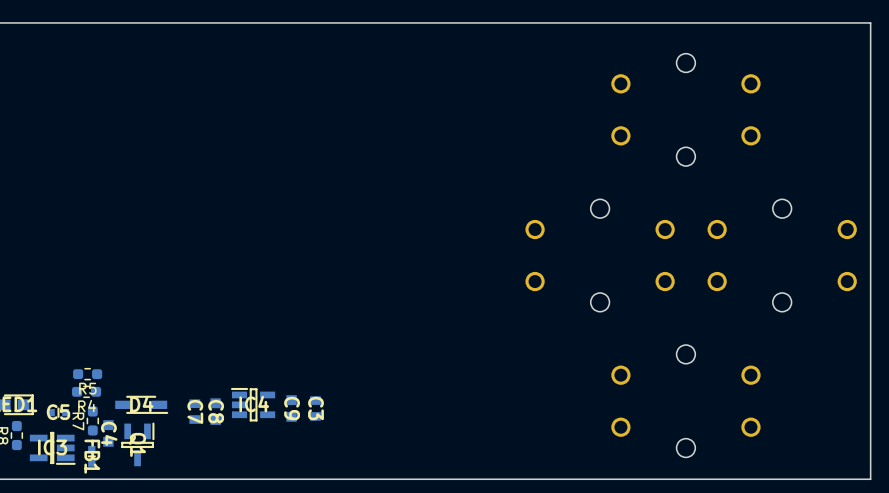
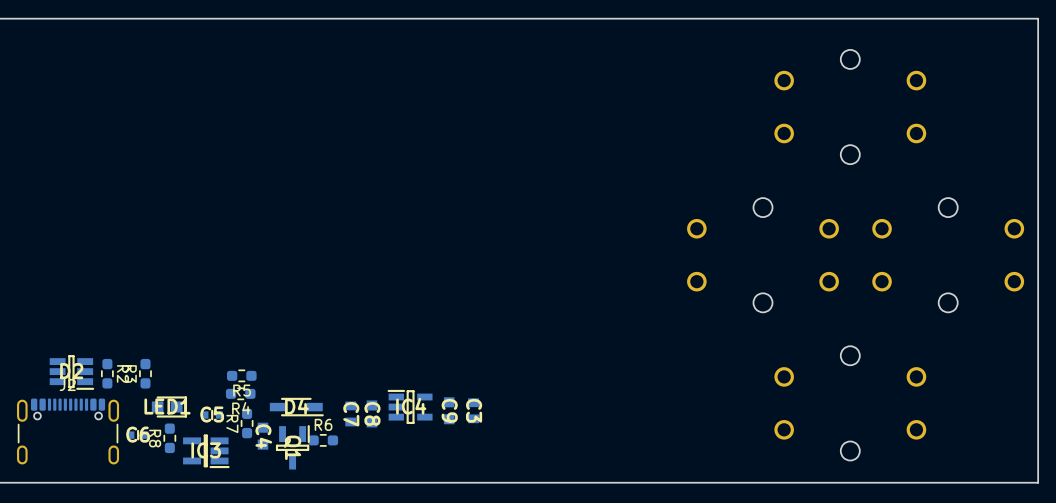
R6: none -> (323, 440)
FB1: (91, 456) -> none

